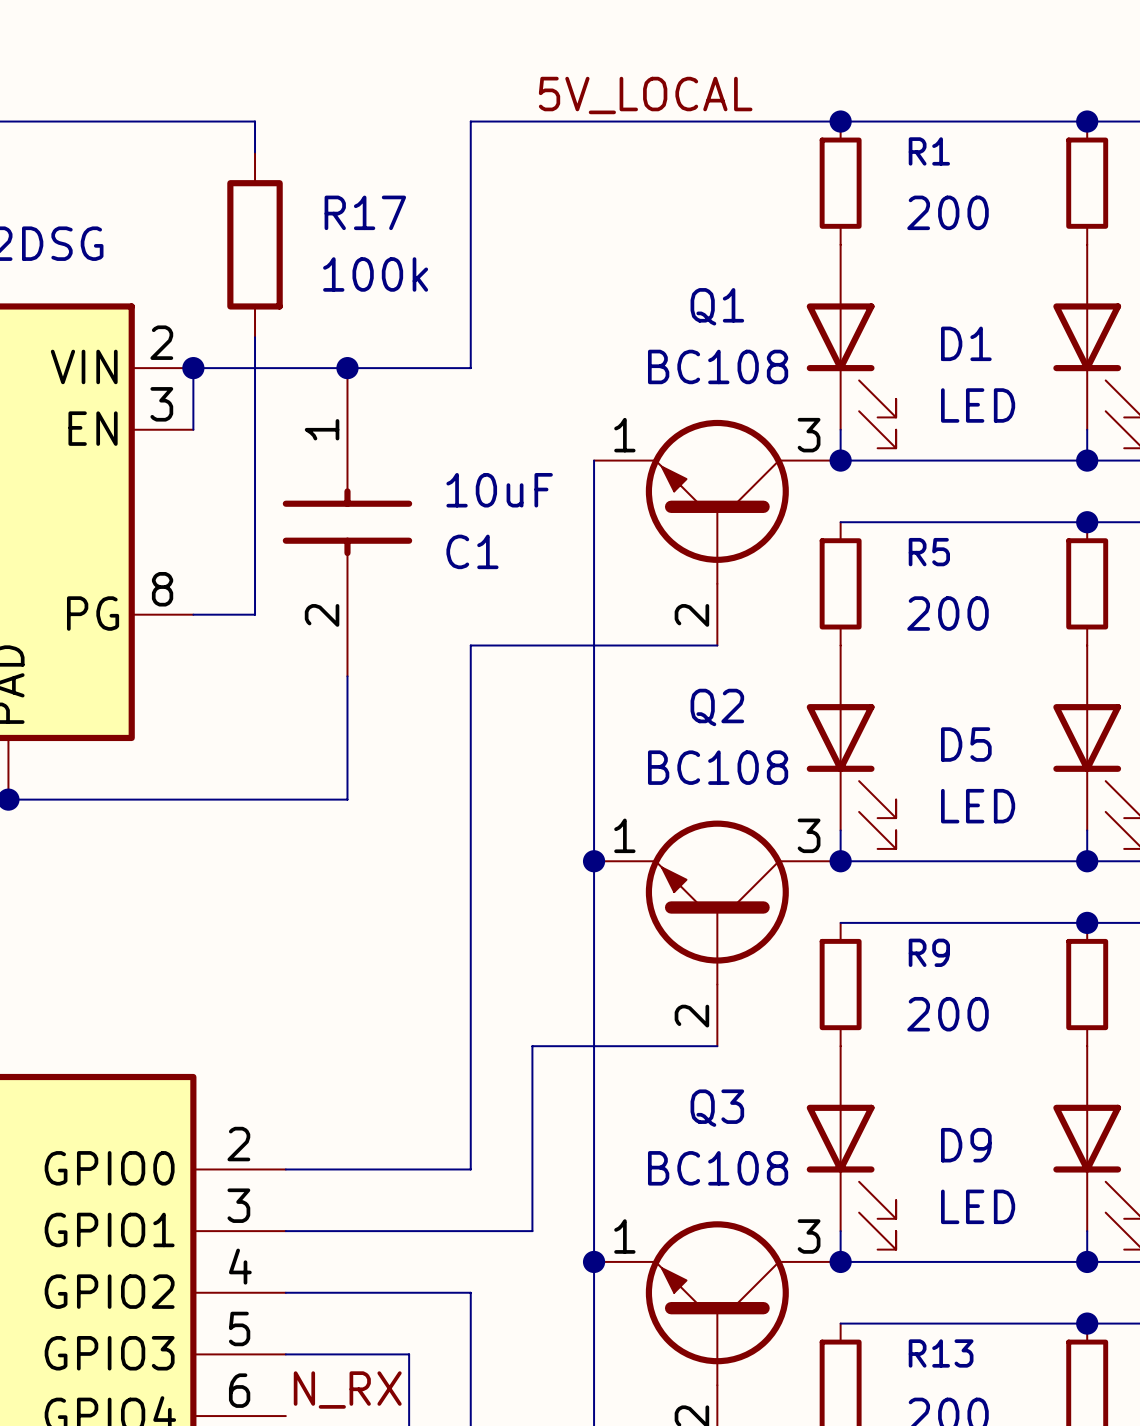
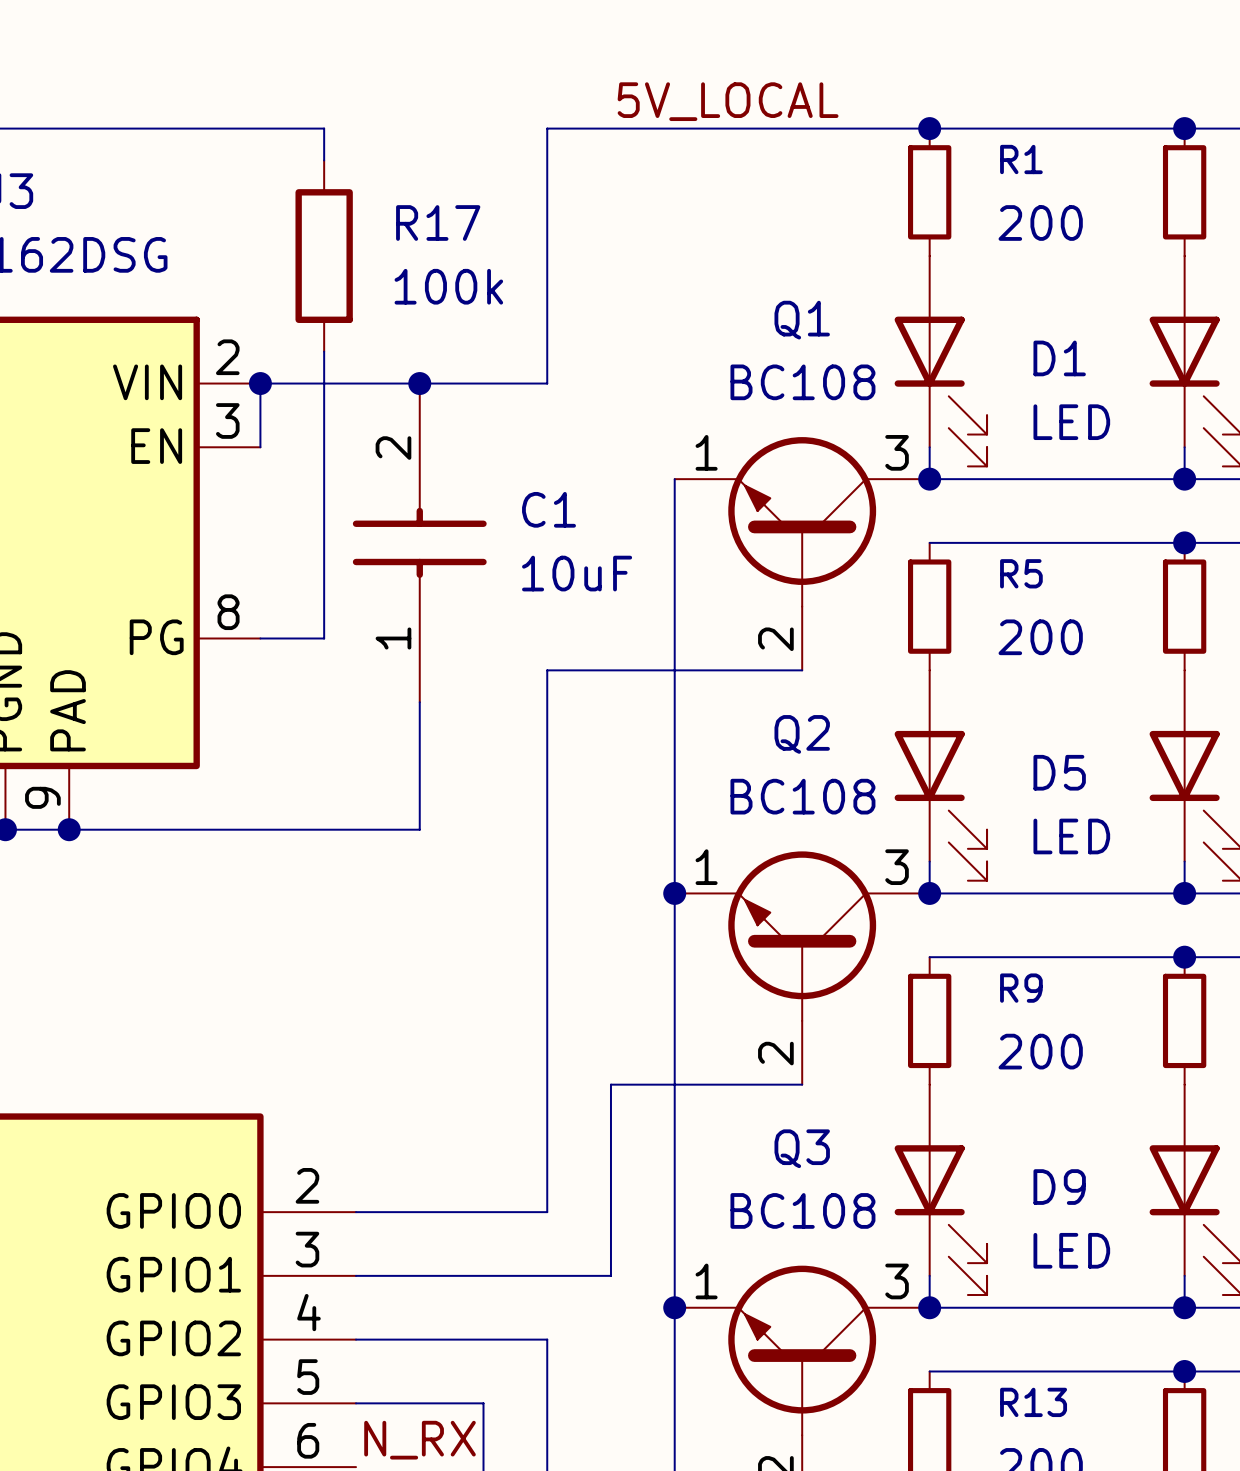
C1 value position: 10uF (499, 490) -> 10uF (577, 573)
C1 rotation: 0° (347, 522) -> 180° (419, 542)
C1 name position: C1 (472, 551) -> C1 (549, 509)

